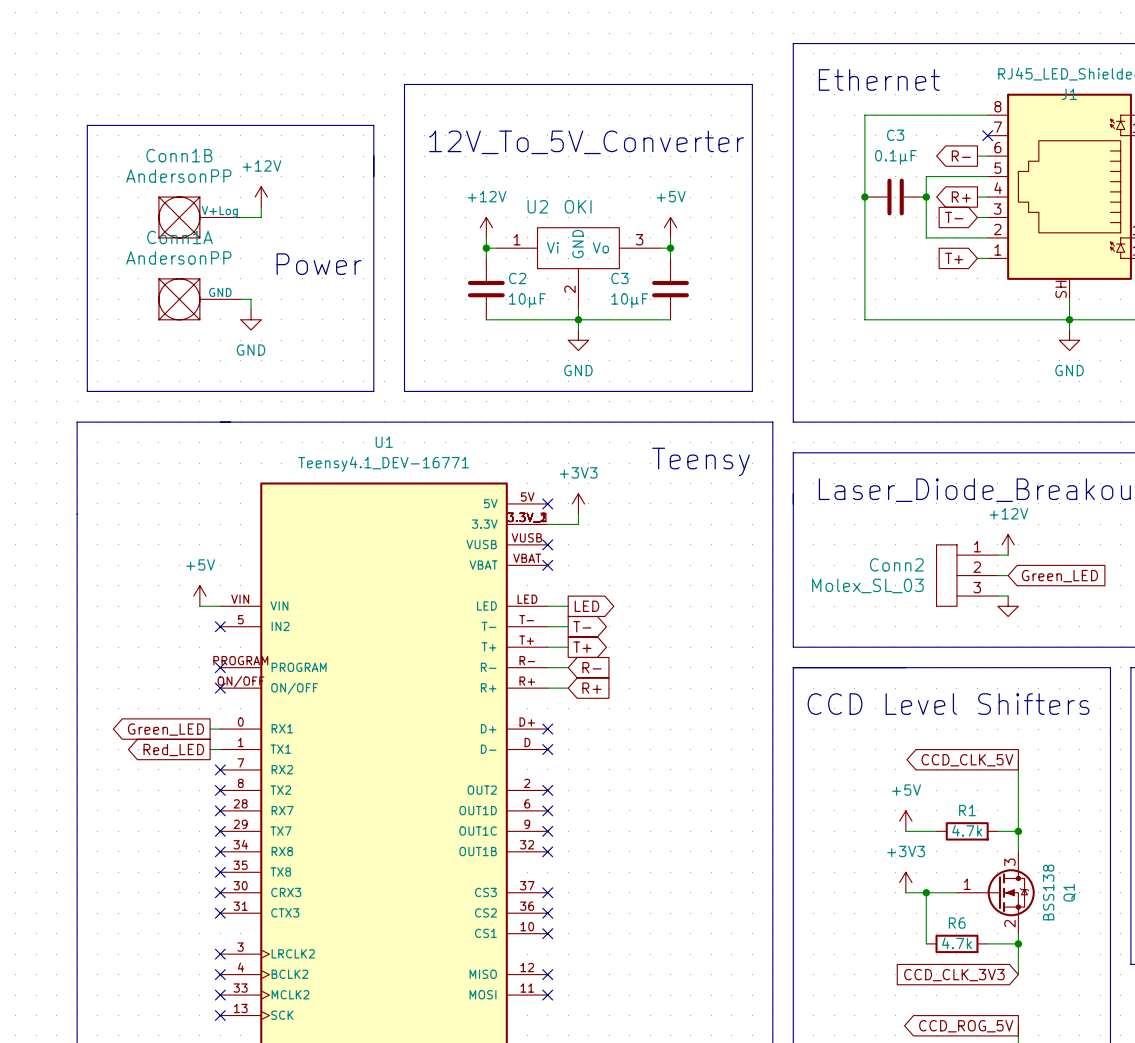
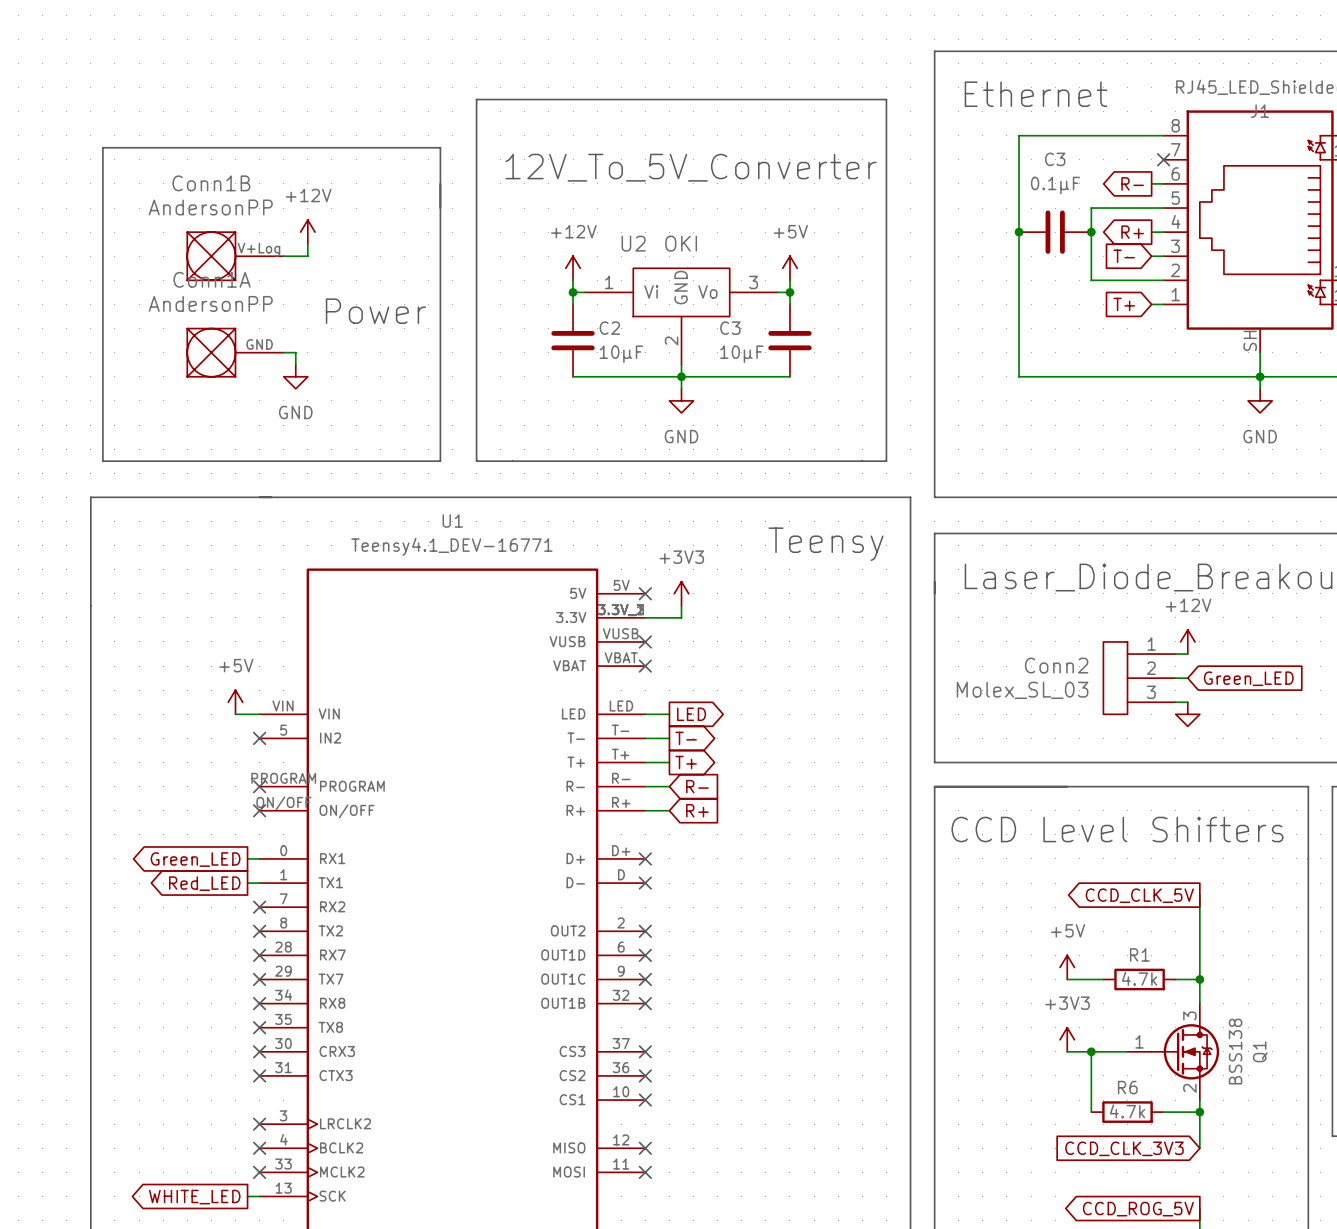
wire: none -> (247, 1196) (259, 1196)
no-connect mark: (220, 1015) -> none
global label: none -> WHITE_LED (194, 1197)

